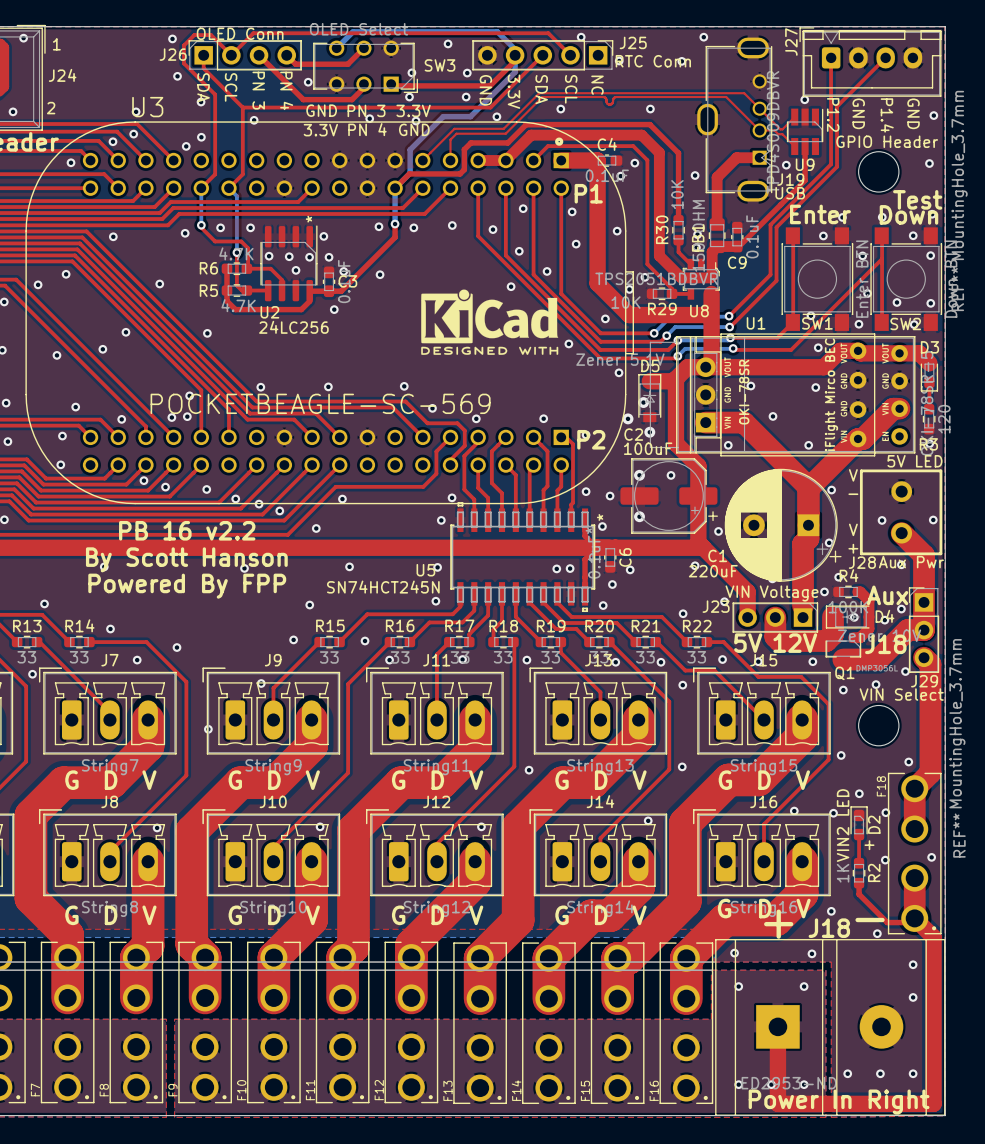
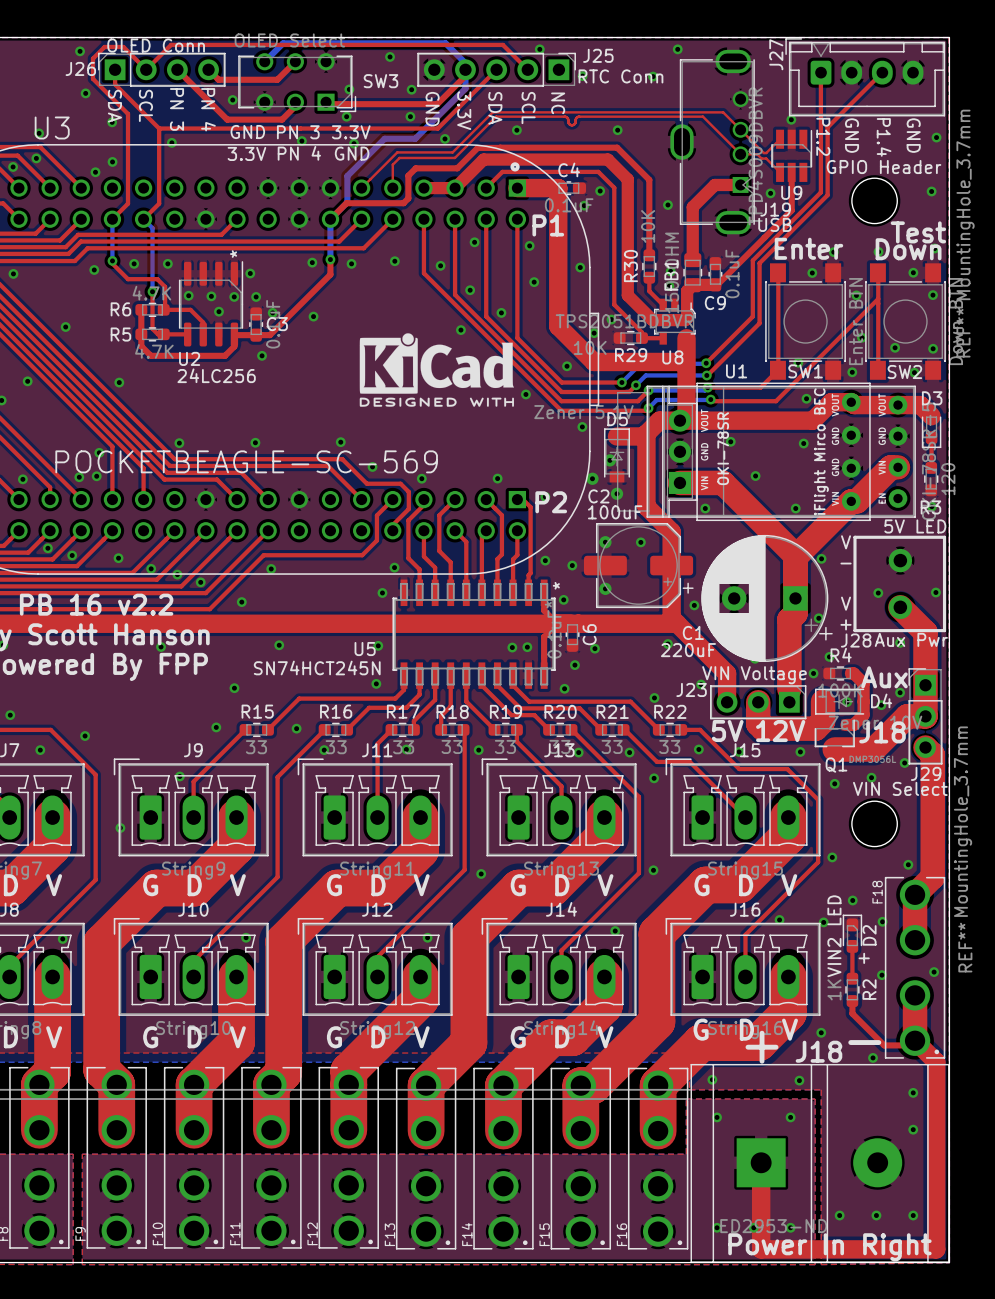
U5 footprint: [450, 502, 596, 613] -> [392, 579, 556, 689]

